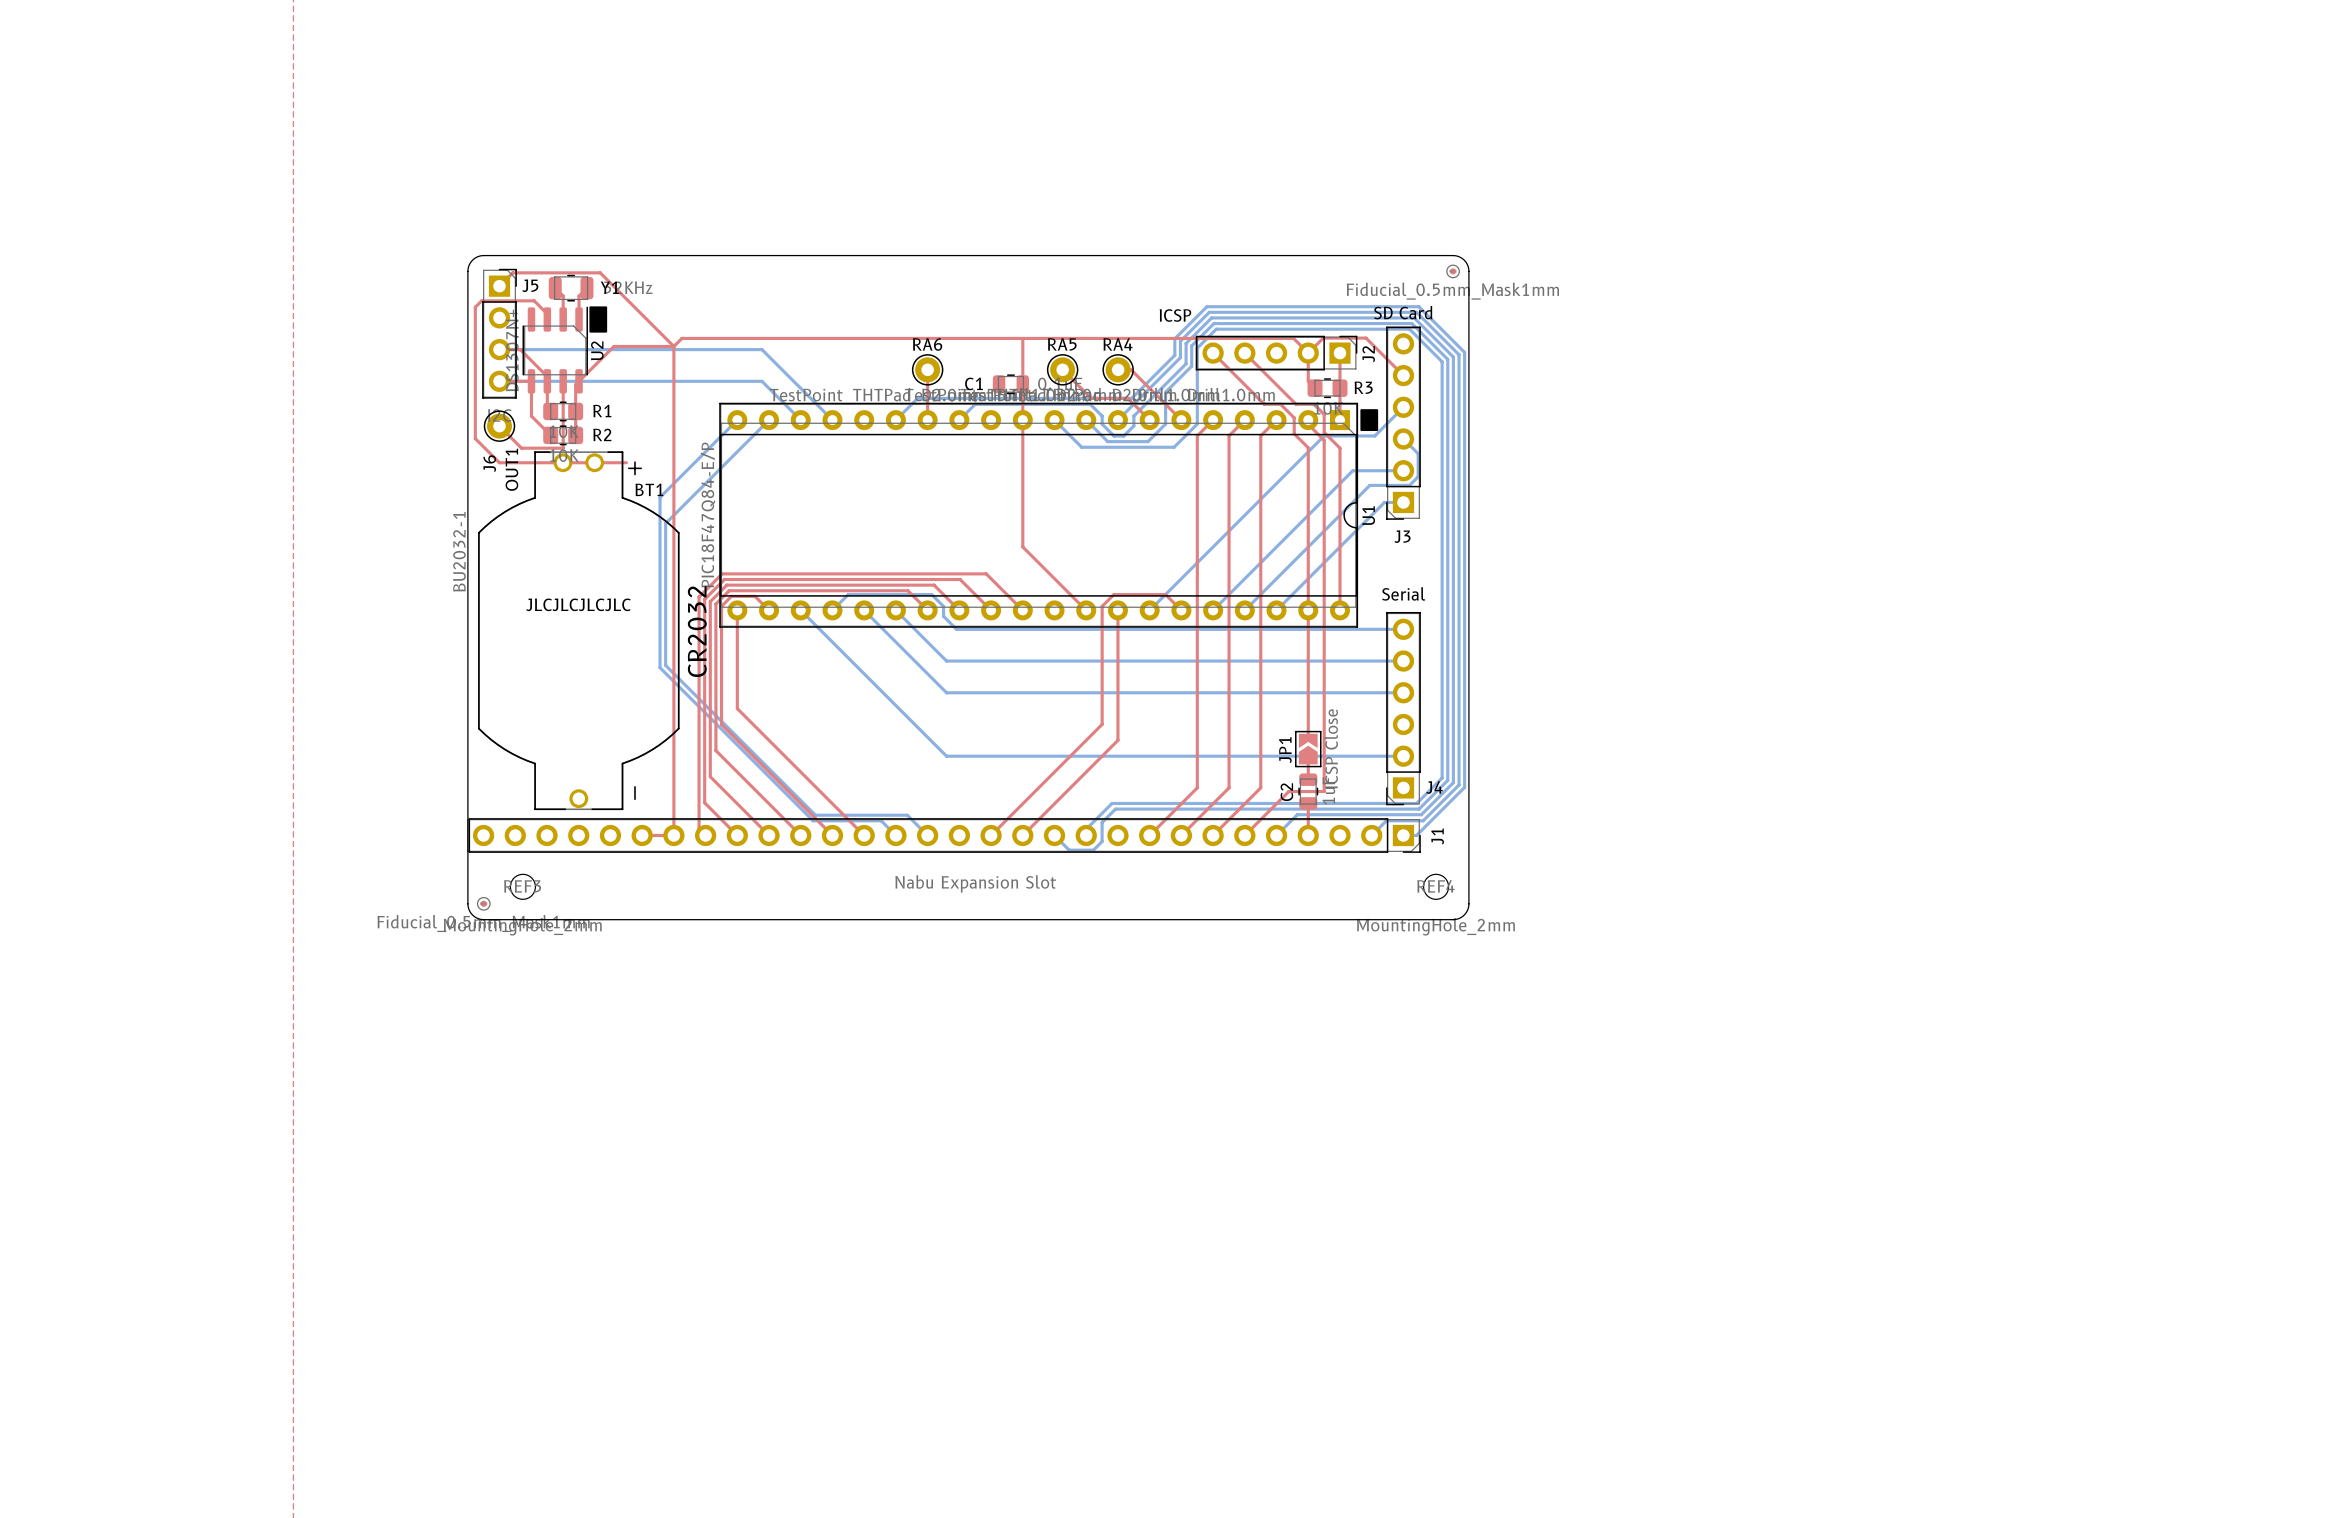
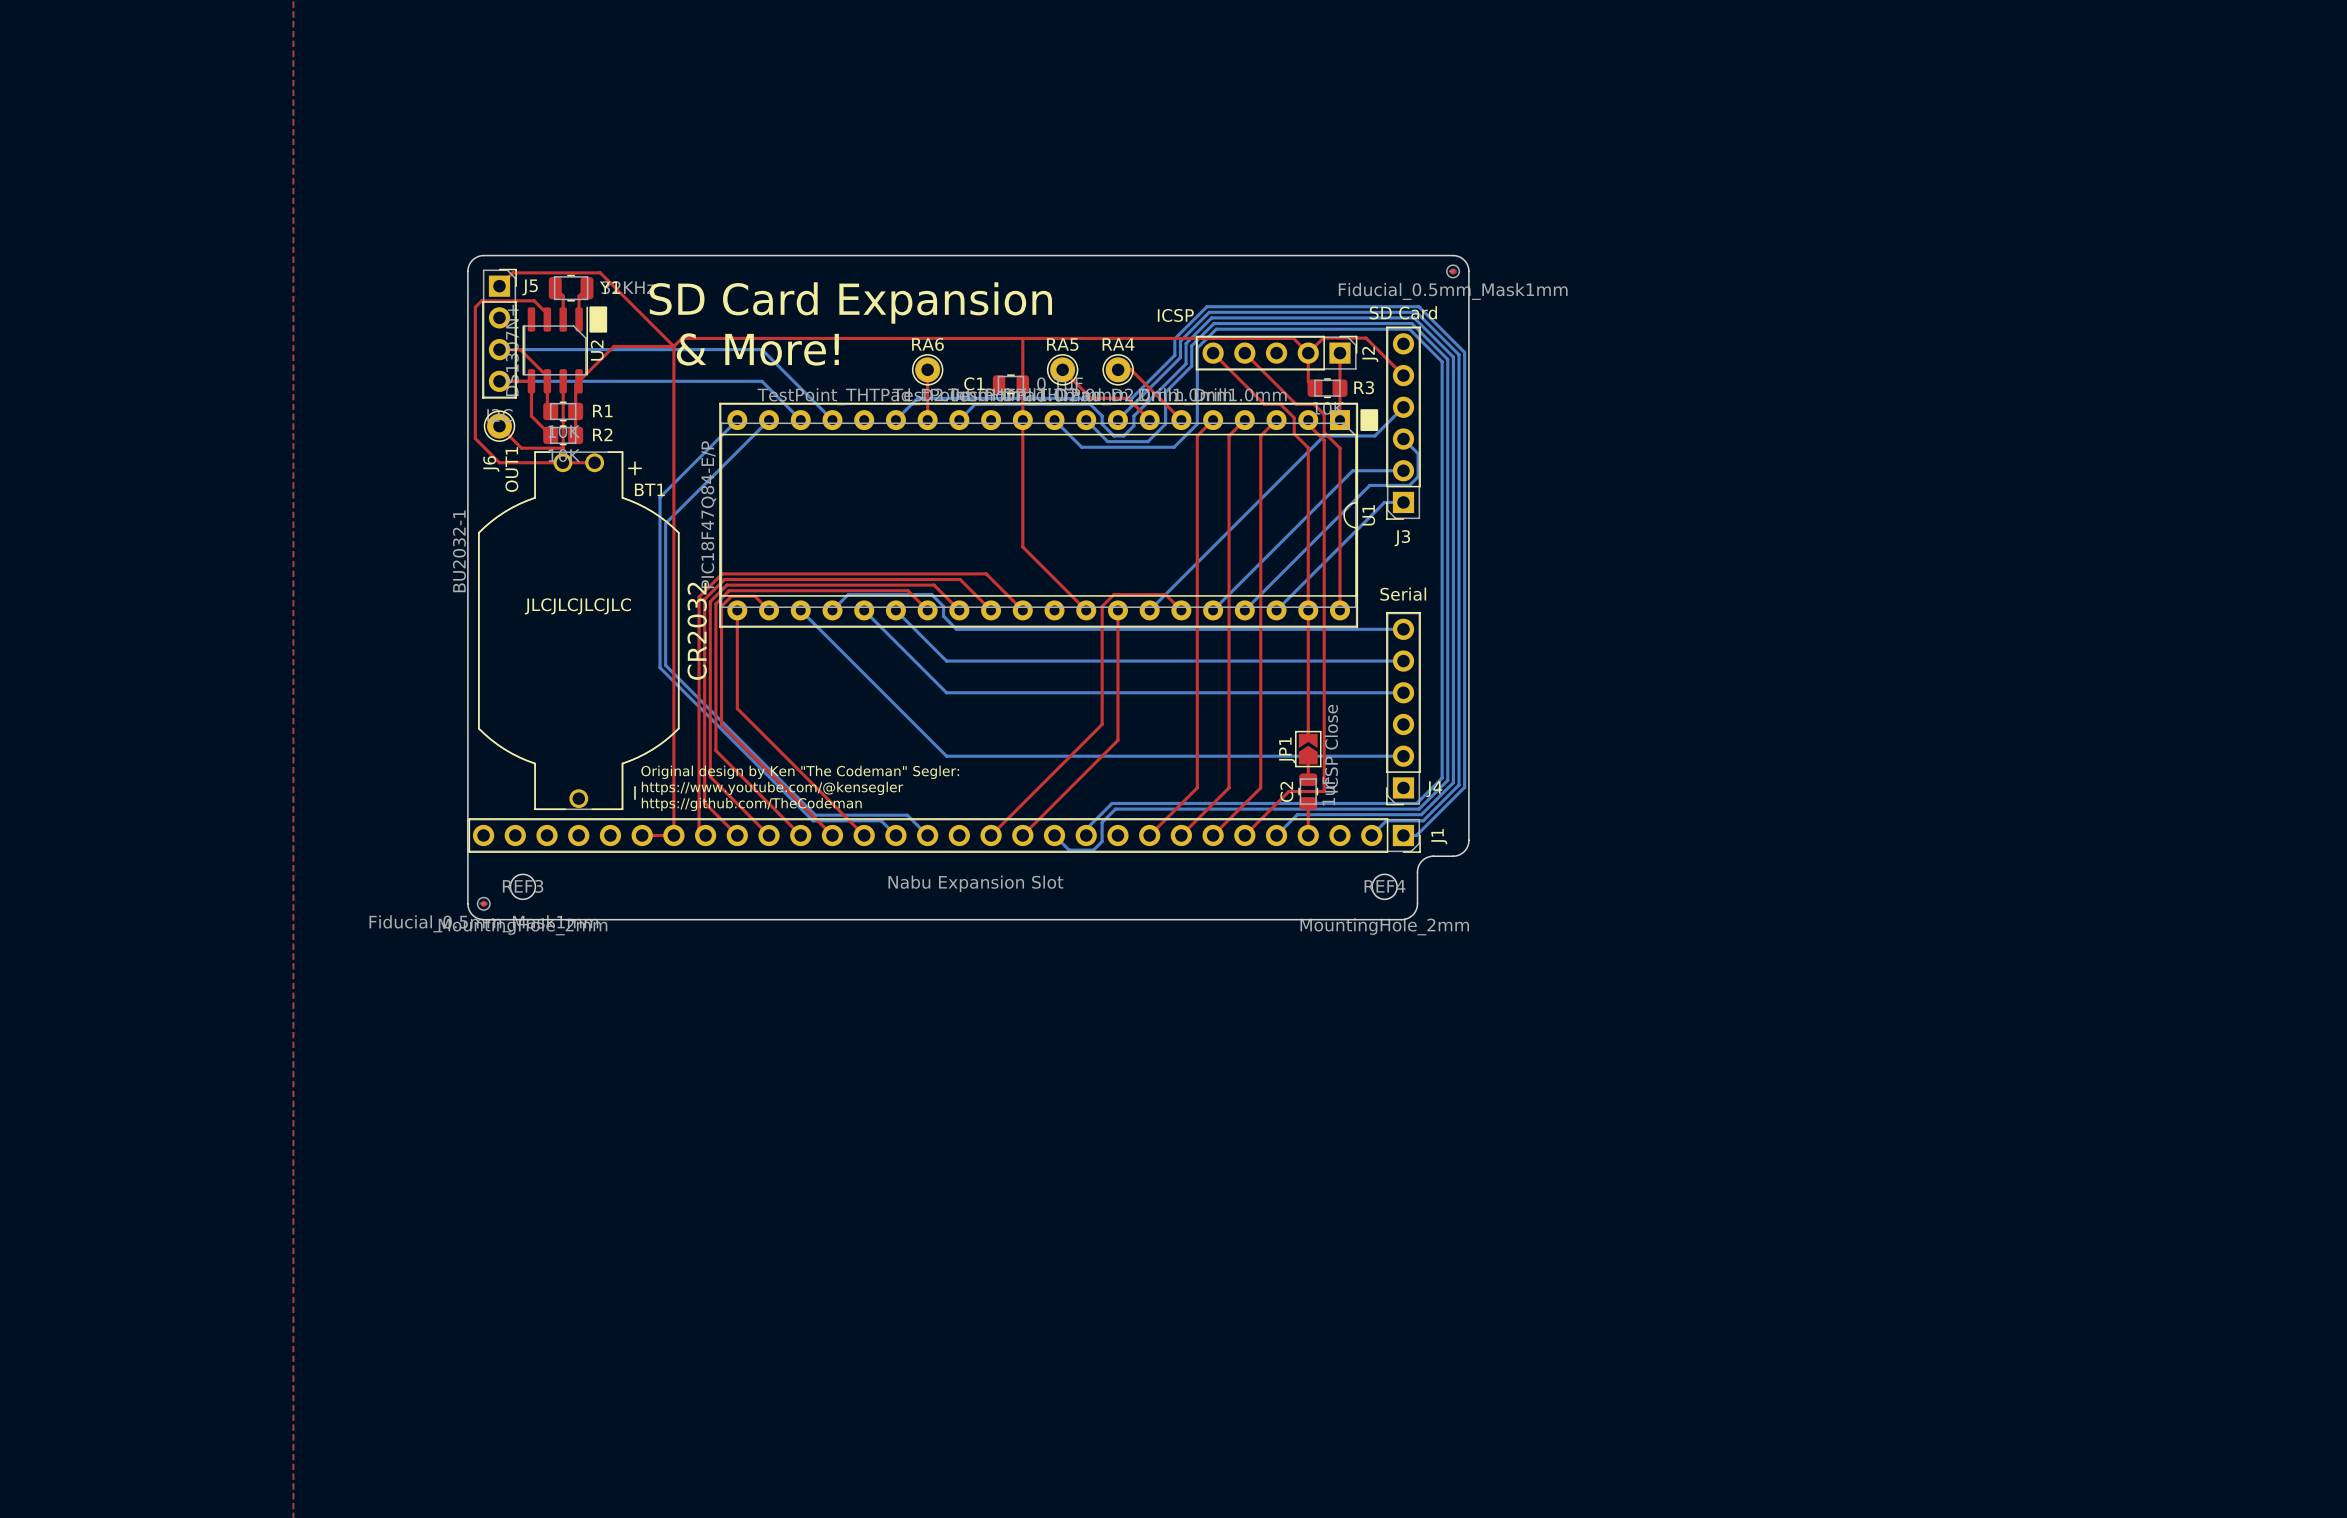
text: none -> SD Card Expansion (850, 302)
text: none -> & More! (757, 349)
top track: (594, 462) (626, 462) -> none
text: none -> Original design by Ken "The Codeman" Segler: (800, 772)
text: none -> https://www.youtube.com/@kensegler (772, 788)
text: none -> https://github.com/TheCodeman (751, 804)
board edge: (1468, 840) (1468, 903) (1465, 913) (1454, 919) (1401, 919) -> (1468, 840) (1466, 848) (1459, 854) (1429, 856) (1420, 862) (1417, 870) (1416, 909) (1411, 916) (1401, 919)
REF4 position: (1436, 886) -> (1384, 886)

